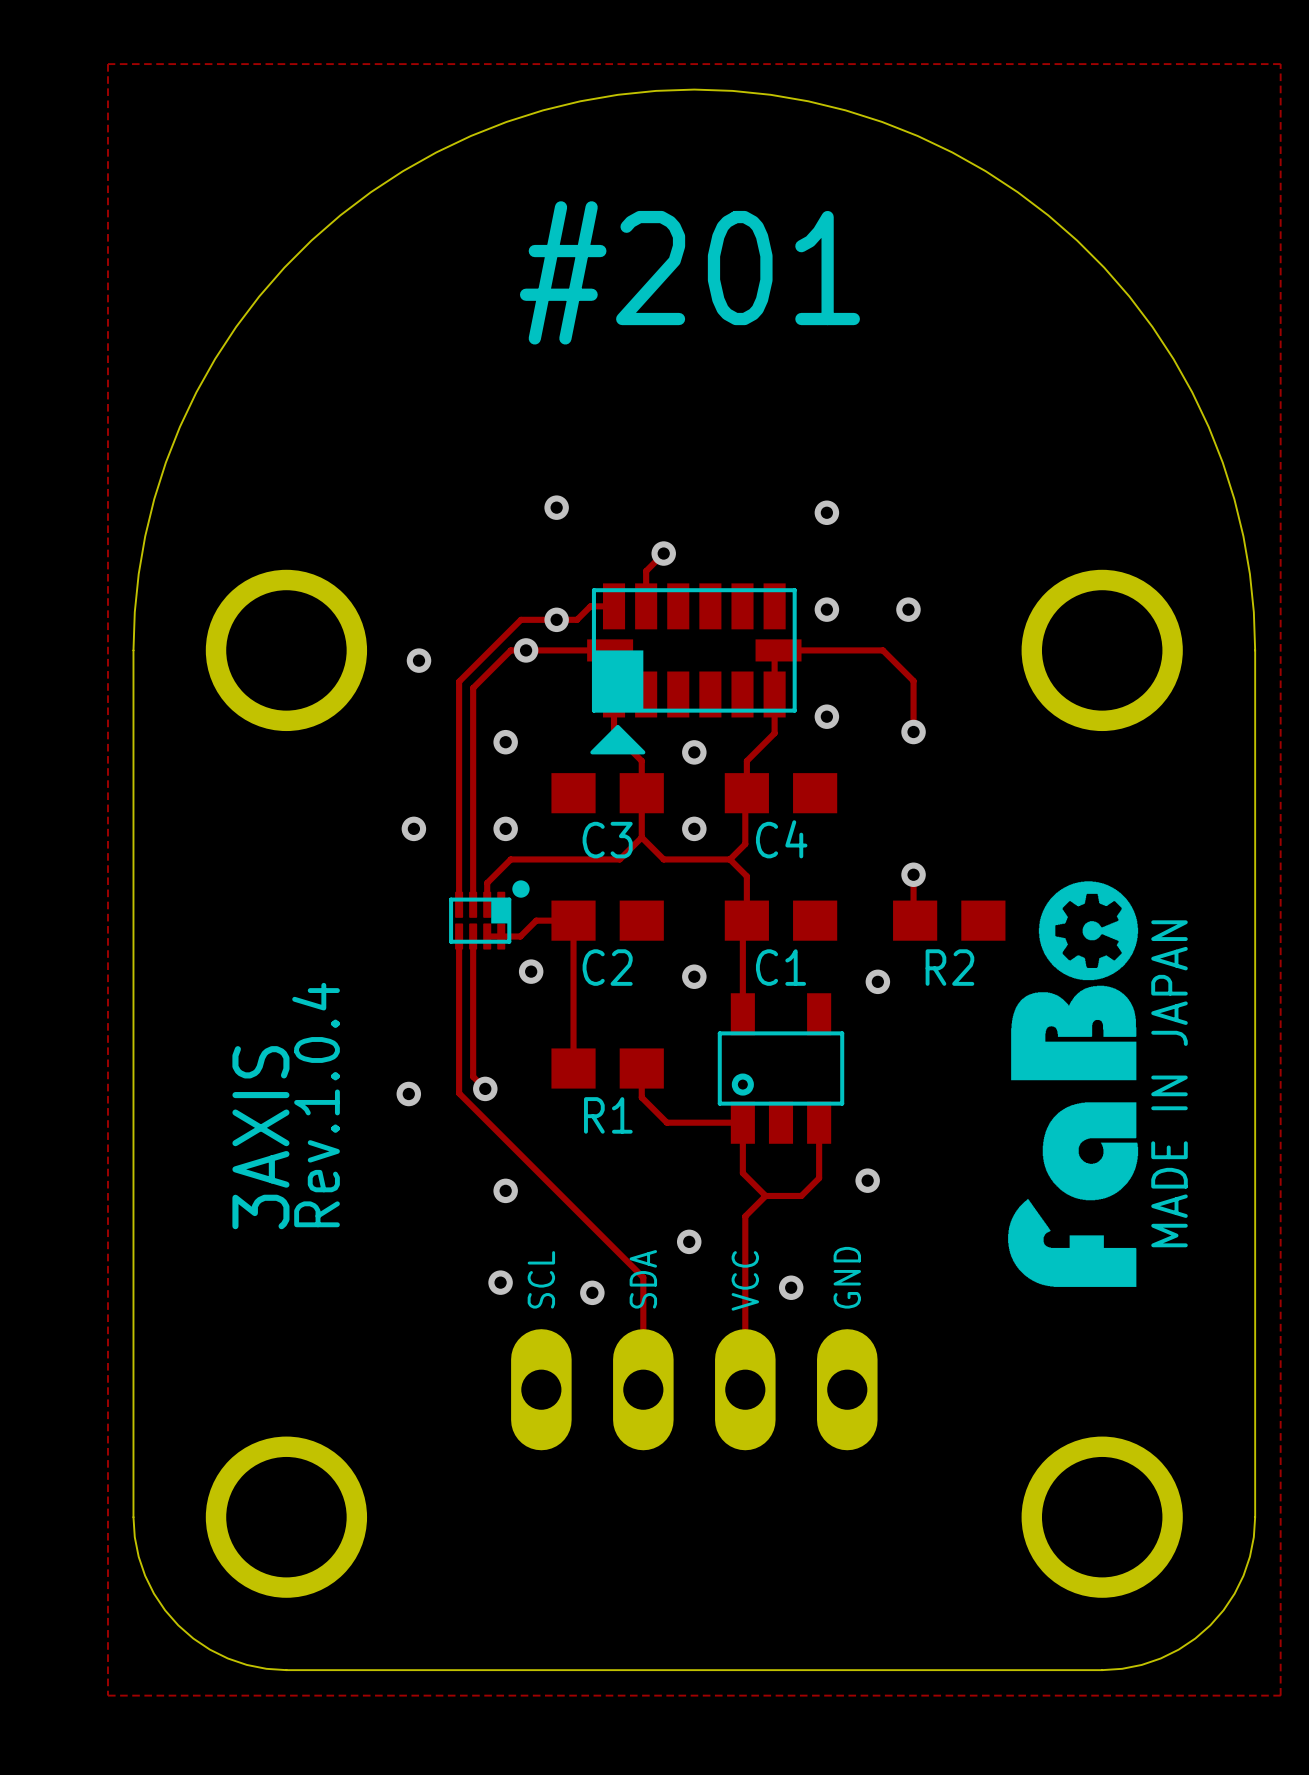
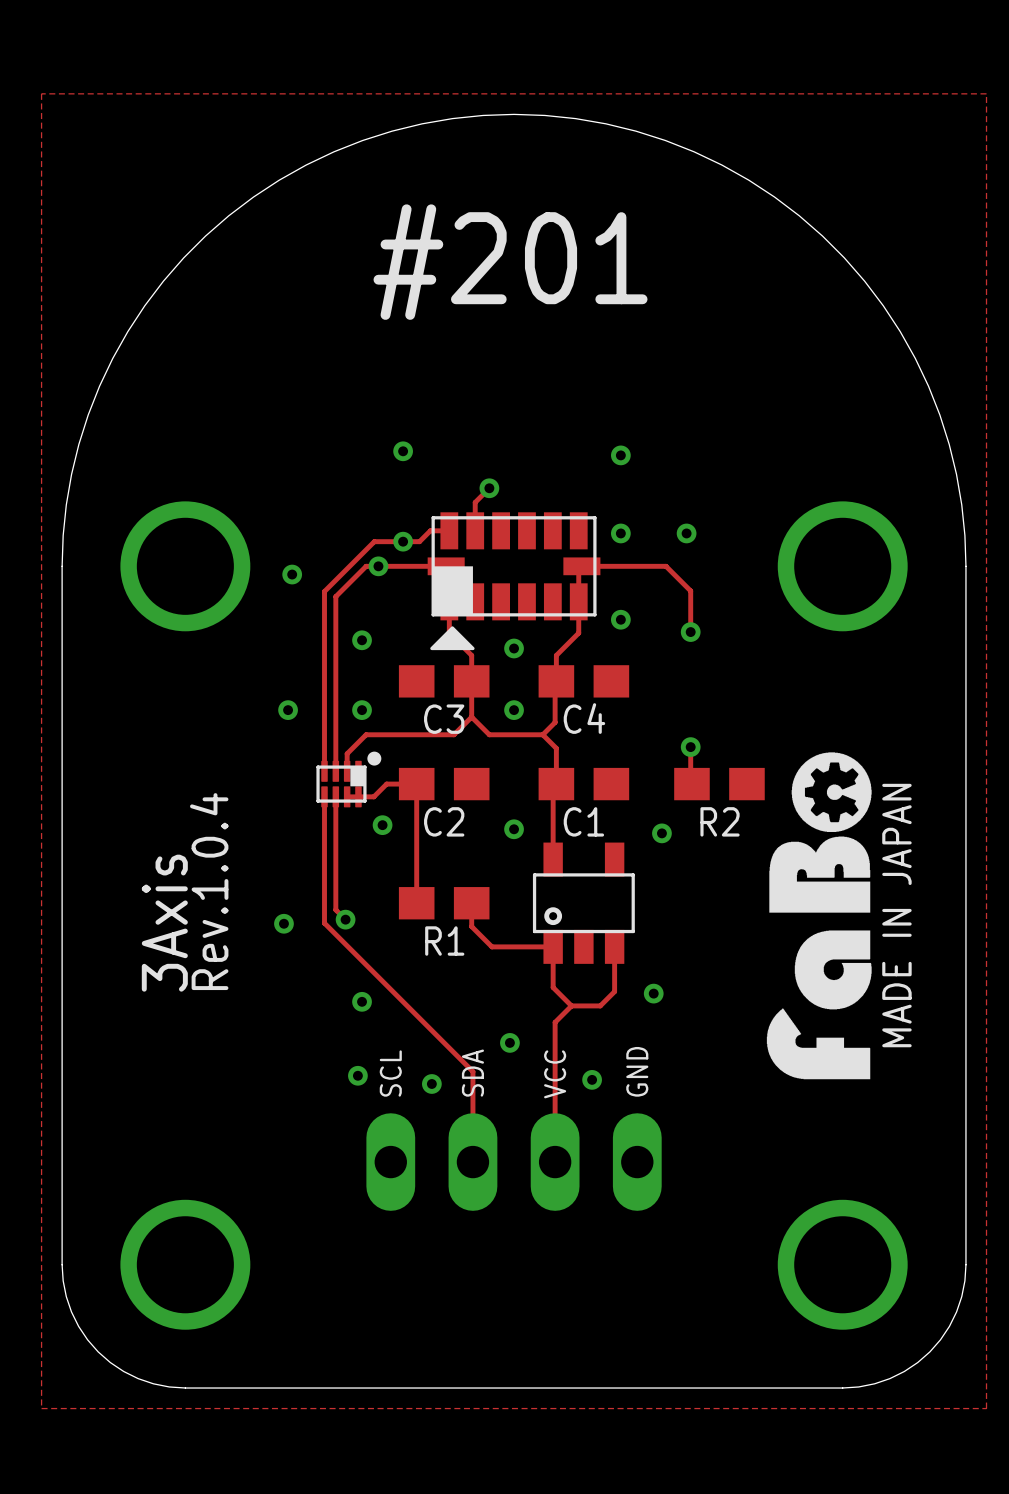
text: none -> 3Axis (164, 923)
text position: Rev.1.0.4 (316, 1105) -> Rev.1.0.4 (209, 891)
text: 3AXIS (260, 1137) -> none

